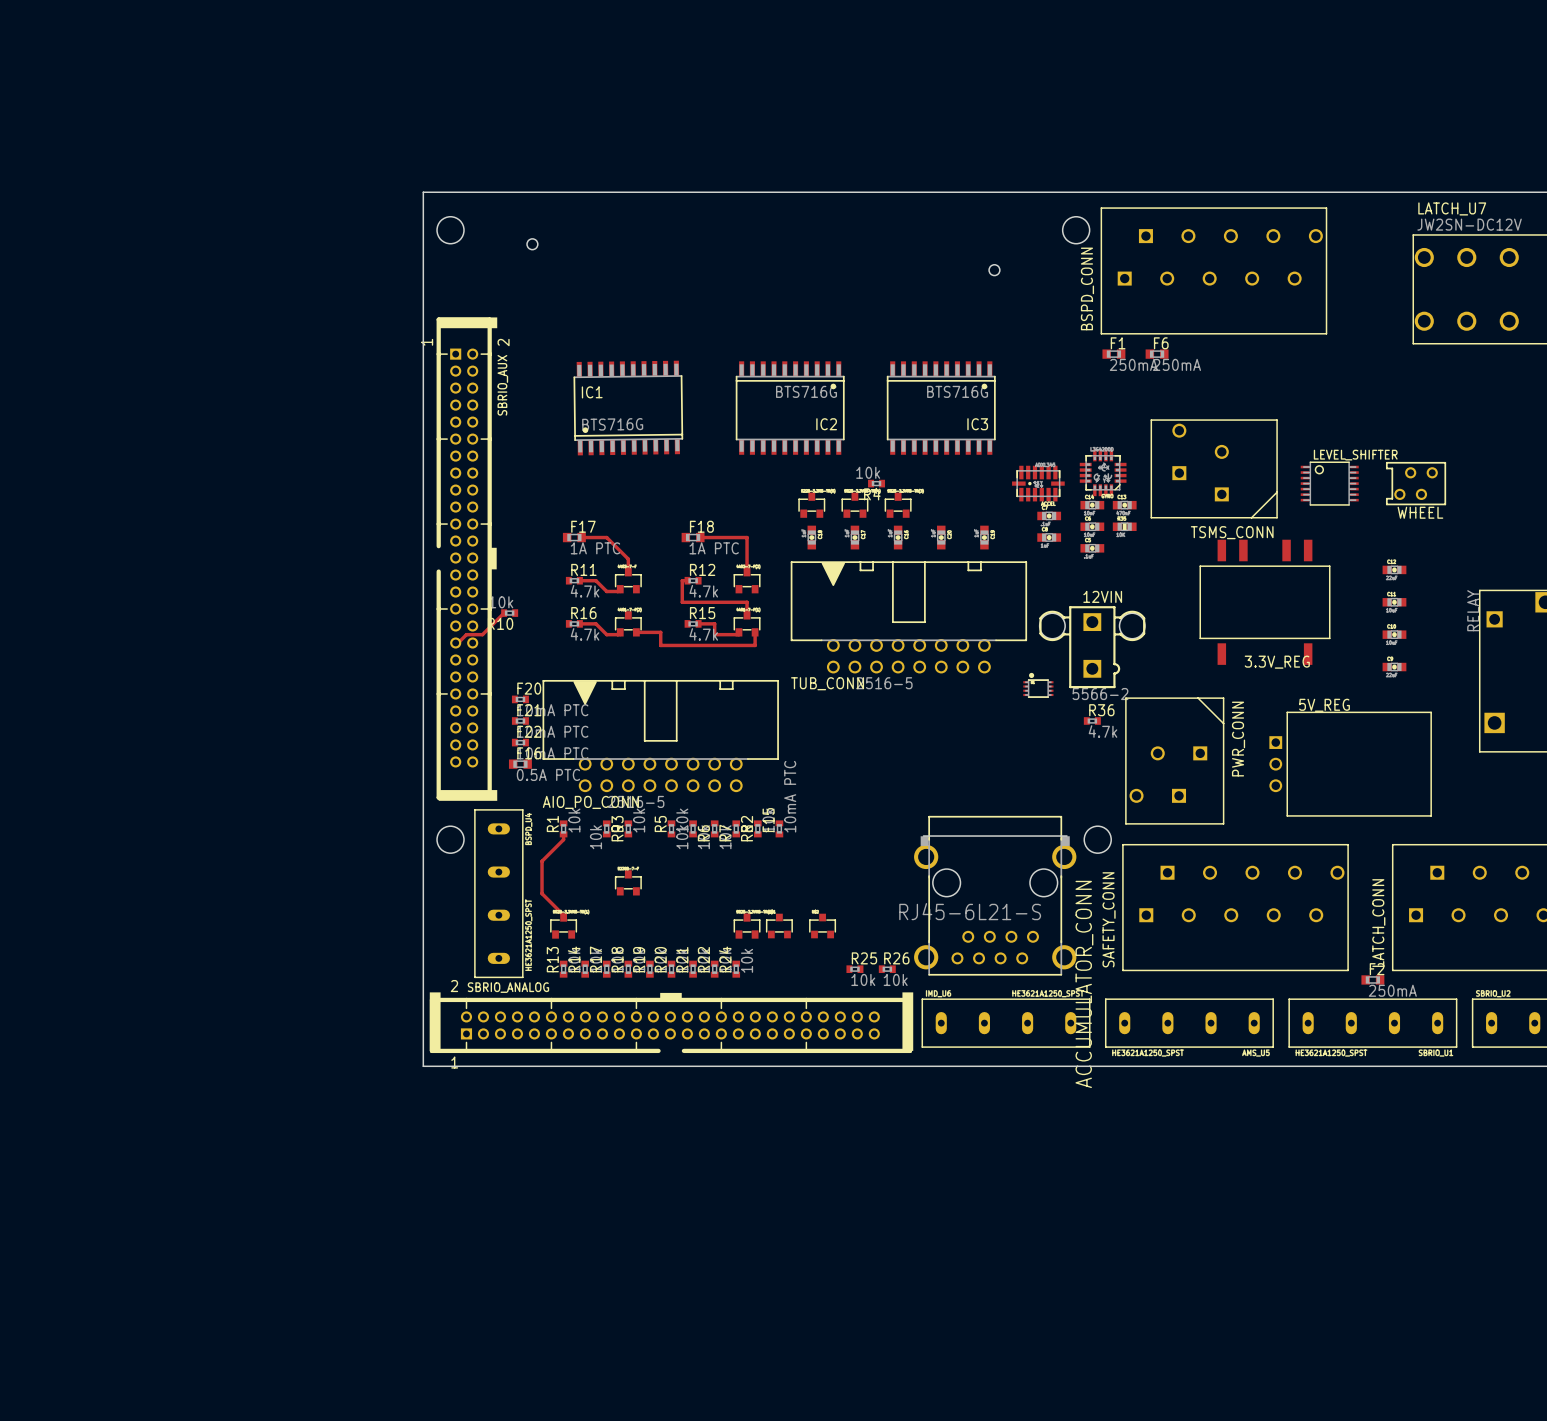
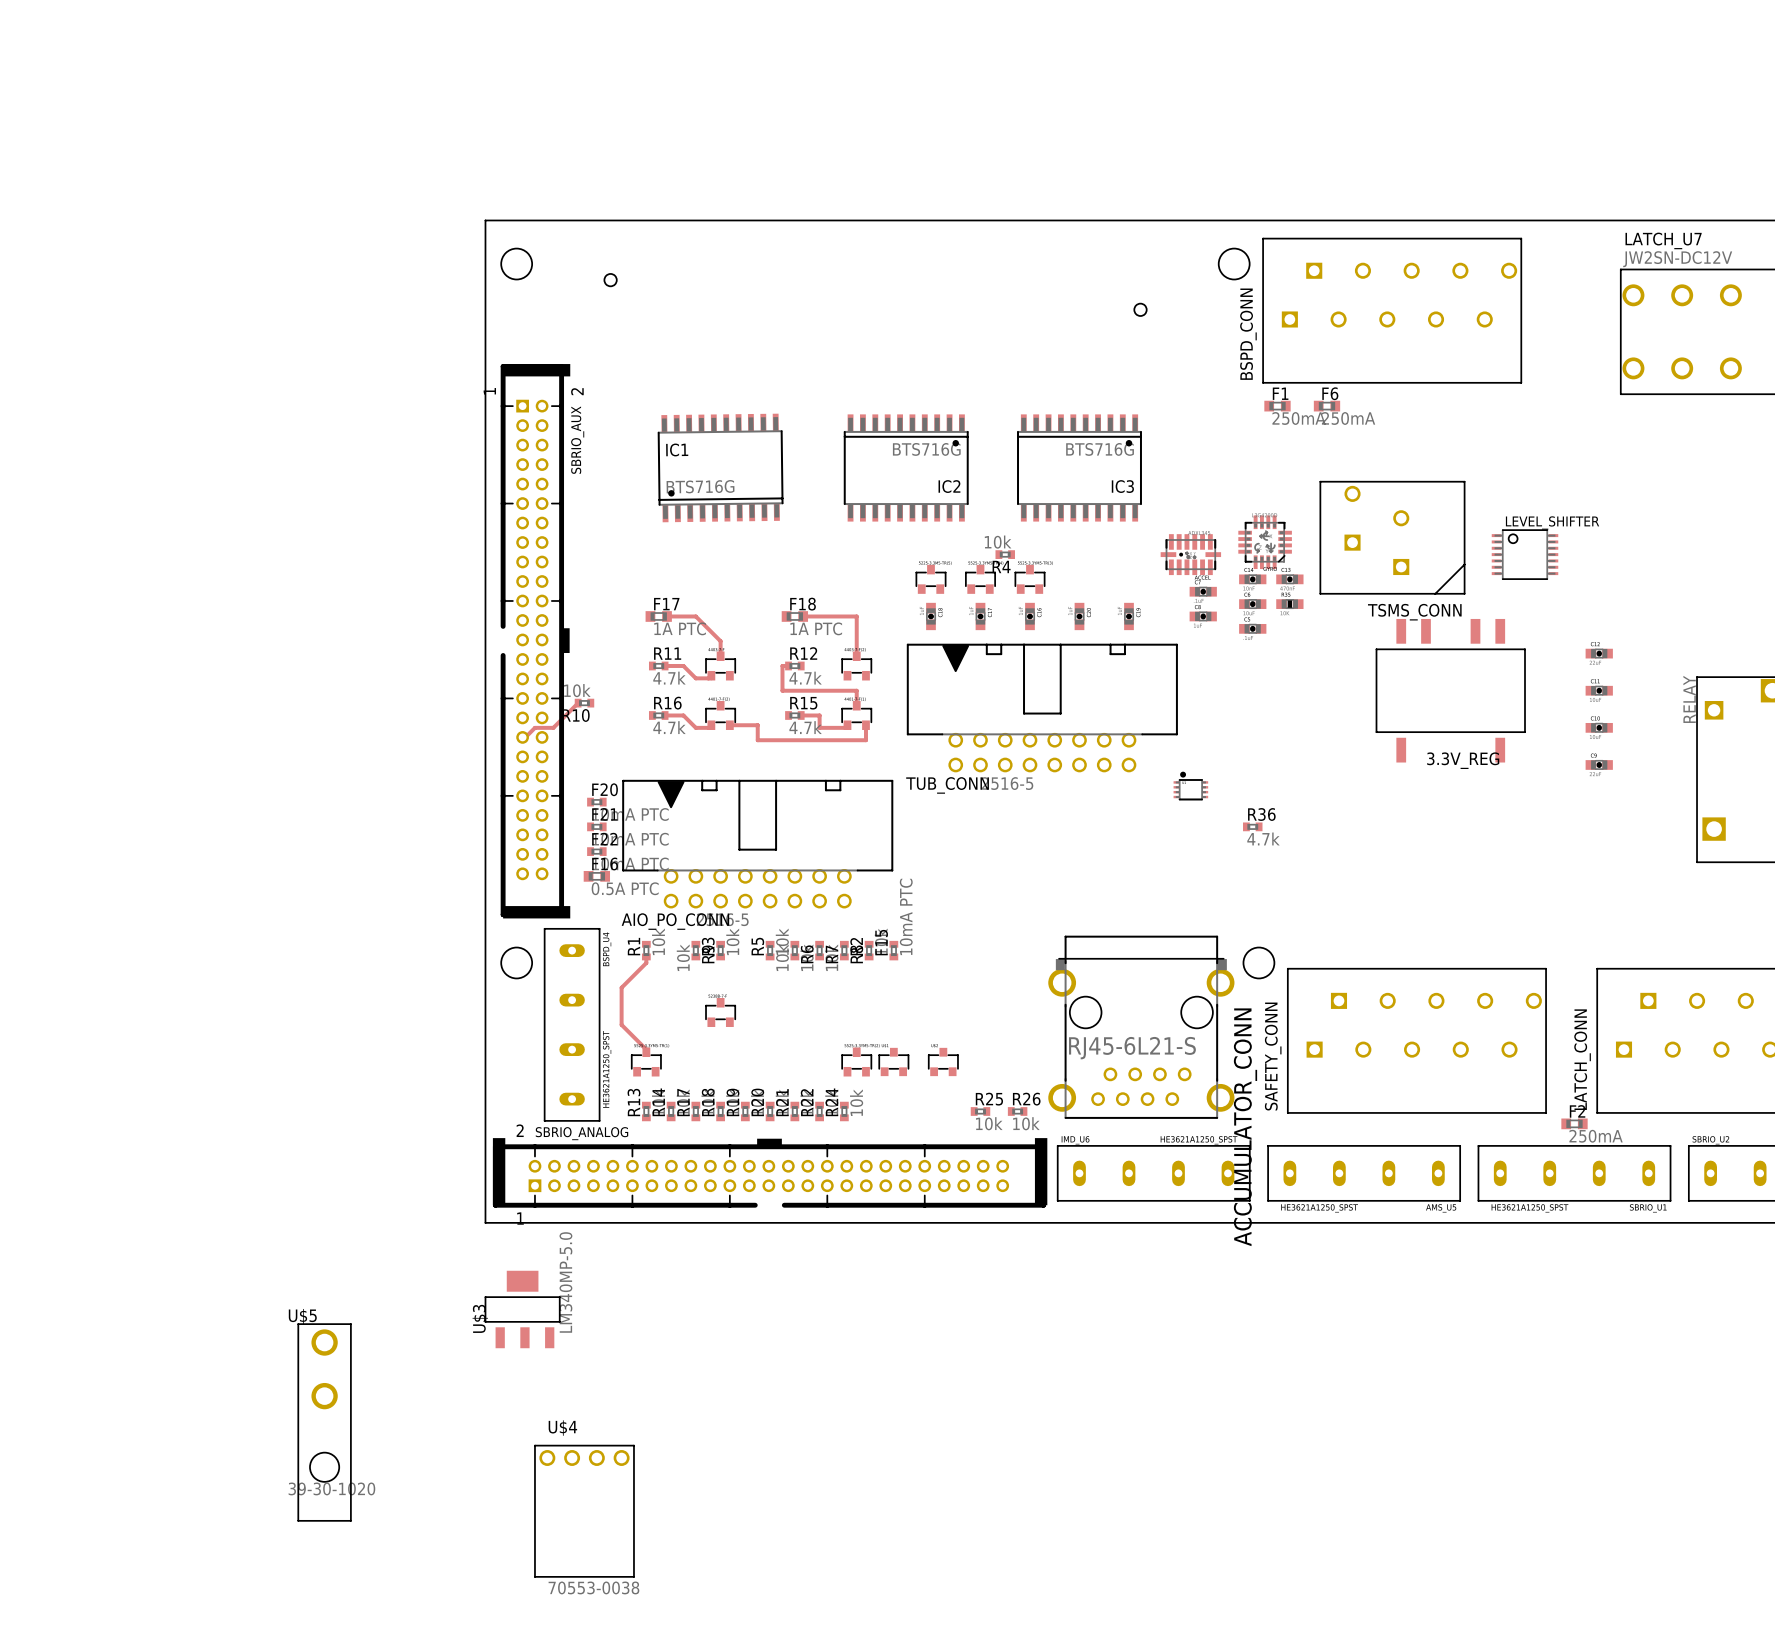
WHEEL: (1416, 483) -> none
12VIN: 5566-2 (1092, 647) -> none
PWR_CONN: (1174, 761) -> none
5V_REG: (1350, 764) -> none
U$3: none -> LM340MP-5.0 (522, 1309)
U$5: none -> 39-30-1020 (324, 1422)
U$4: none -> 70553-0038 (584, 1511)

